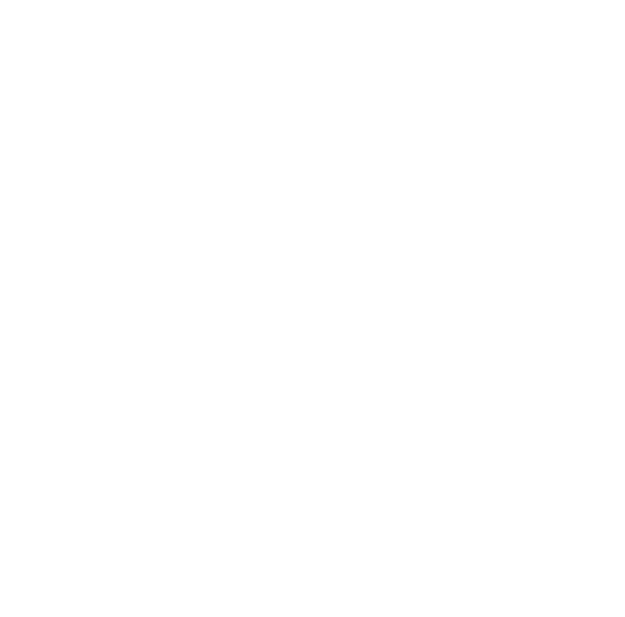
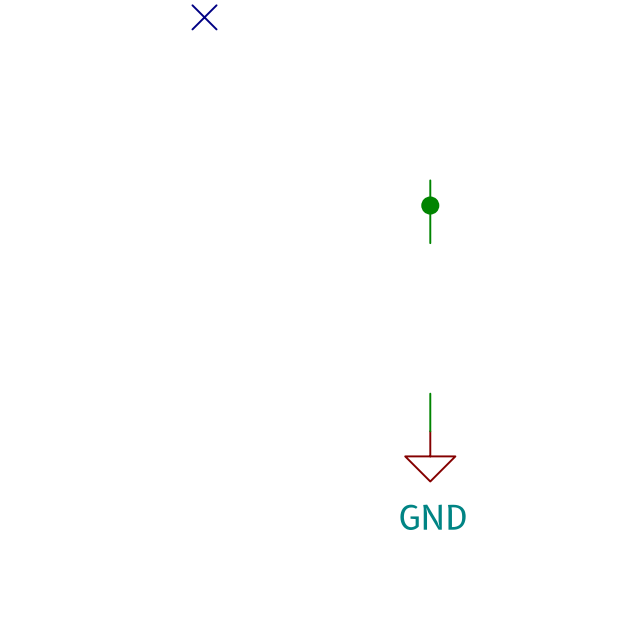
no-connect mark: none -> (204, 17)
wire: none -> (430, 180) (430, 243)
junction: none -> (430, 205)
wire: none -> (430, 393) (430, 431)
power symbol: none -> GND (430, 456)

